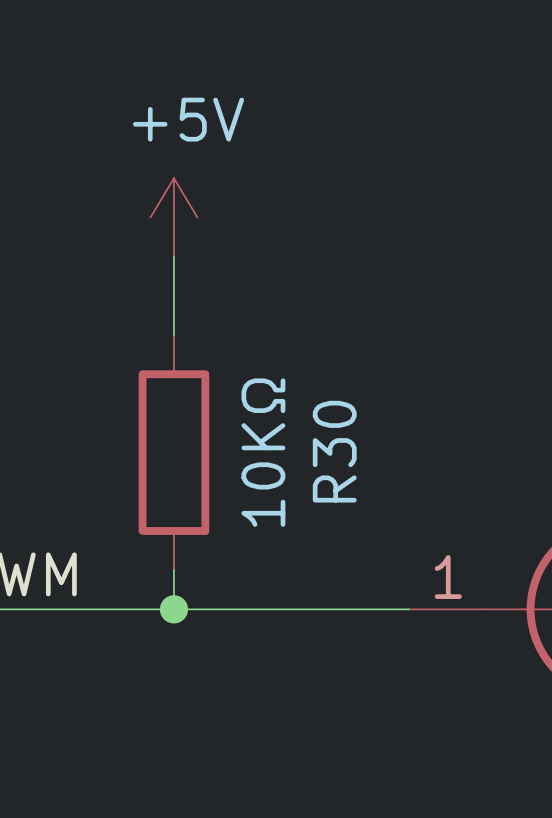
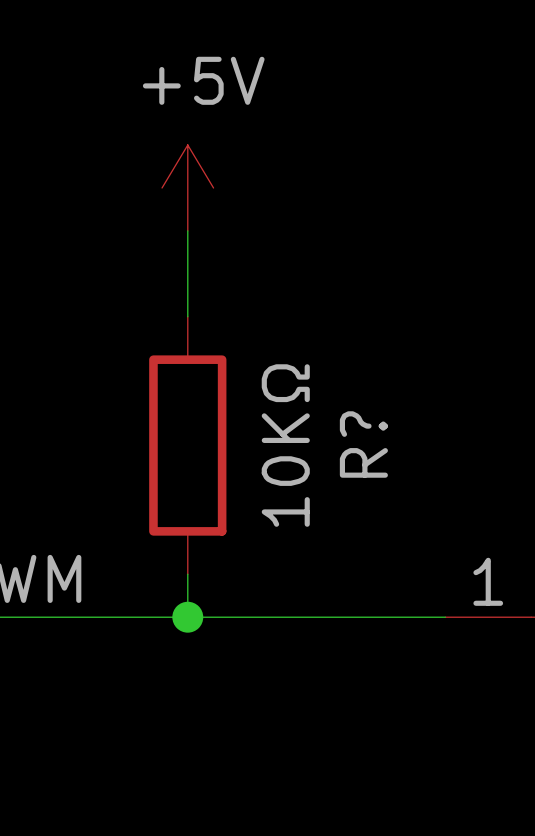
R30 name: R30 (334, 451) -> R? (363, 444)

